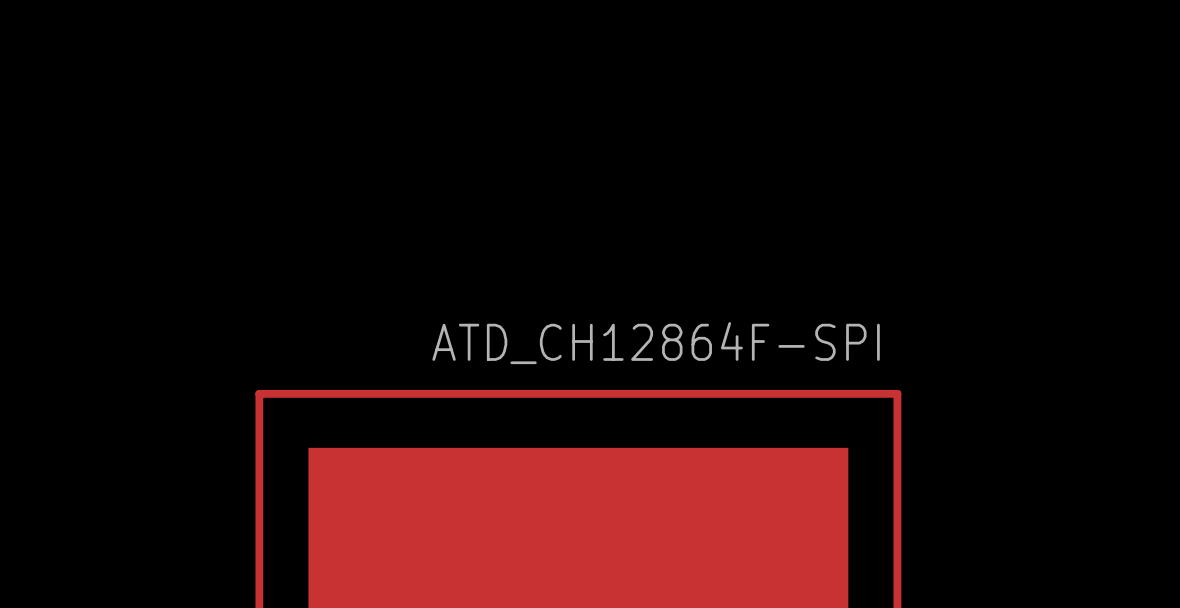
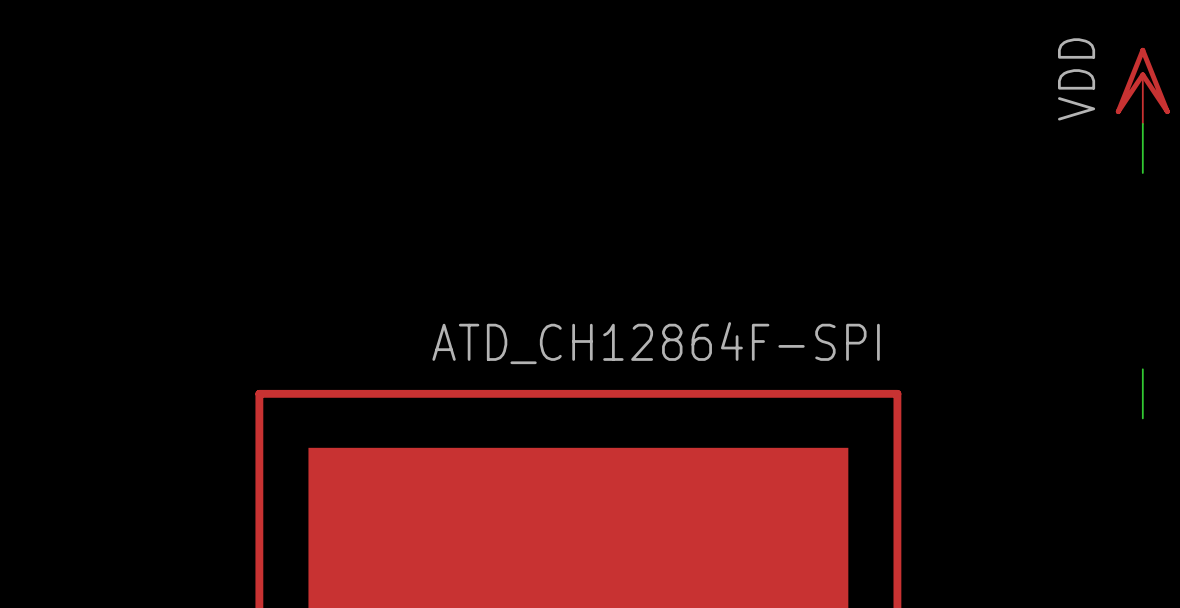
power symbol: none -> VDD (1142, 85)
wire: none -> (1142, 123) (1142, 172)
wire: none -> (1142, 369) (1142, 418)

